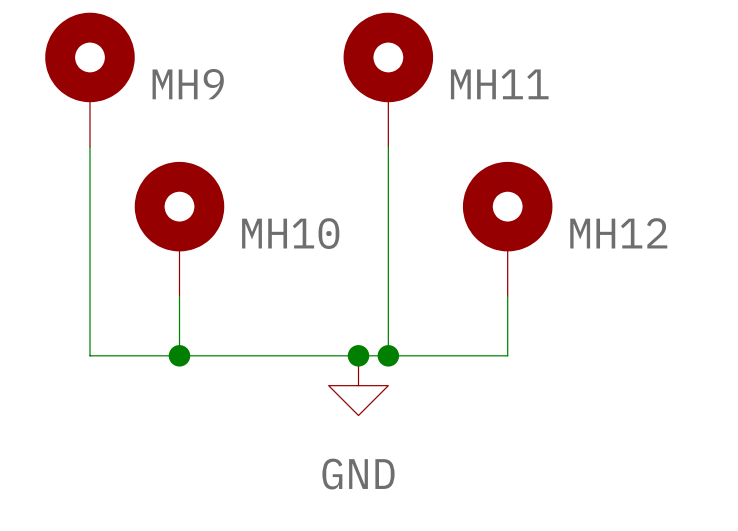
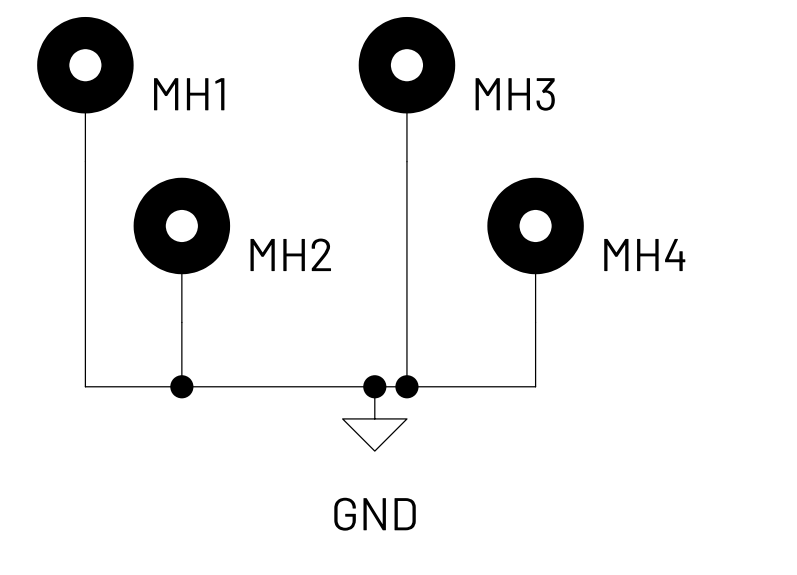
MH9 name: MH9 (188, 84) -> MH1 (189, 94)
MH11 name: MH11 (499, 84) -> MH3 (515, 94)
MH10 name: MH10 (290, 233) -> MH2 (290, 254)
MH12 name: MH12 (618, 233) -> MH4 (644, 255)

